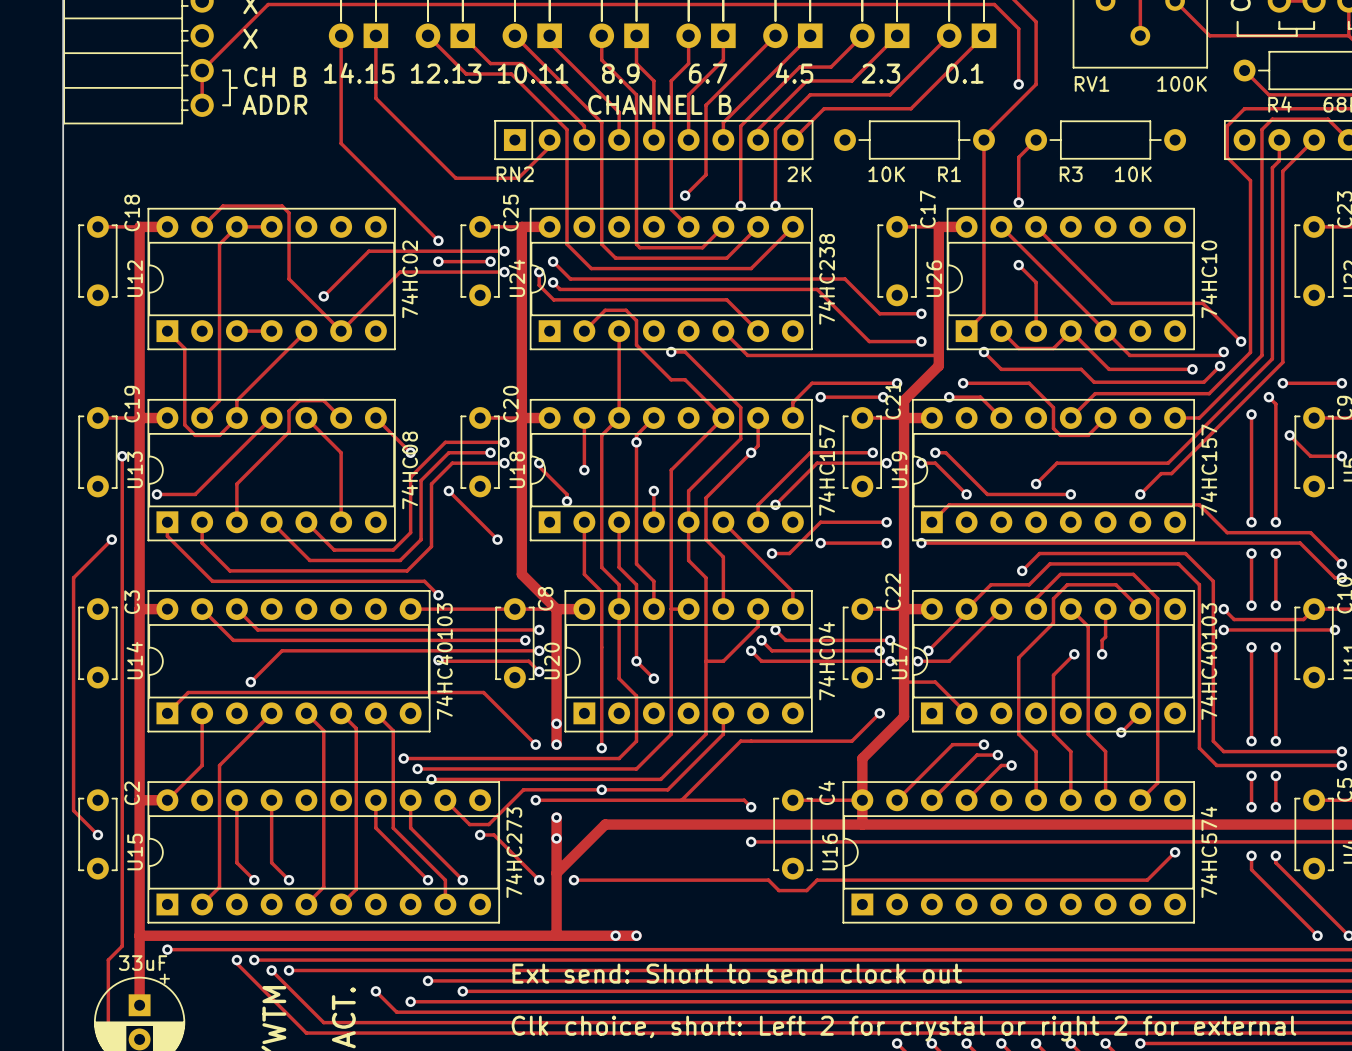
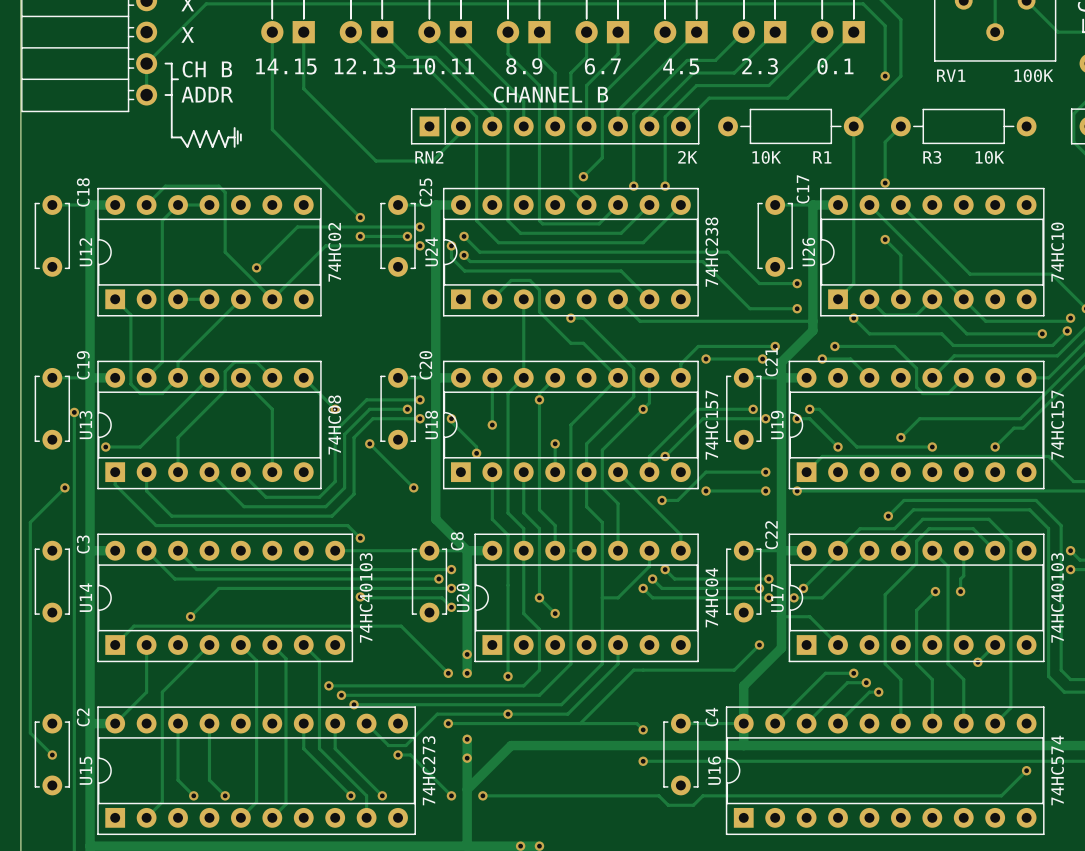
line: none -> (171, 95) (171, 137) (181, 137) (187, 146) (193, 131) (200, 146) (206, 131) (212, 146) (218, 131) (225, 146) (228, 137) (234, 137)
line: none -> (234, 128) (234, 146)
line: none -> (237, 131) (237, 143)
line: none -> (240, 134) (240, 140)

